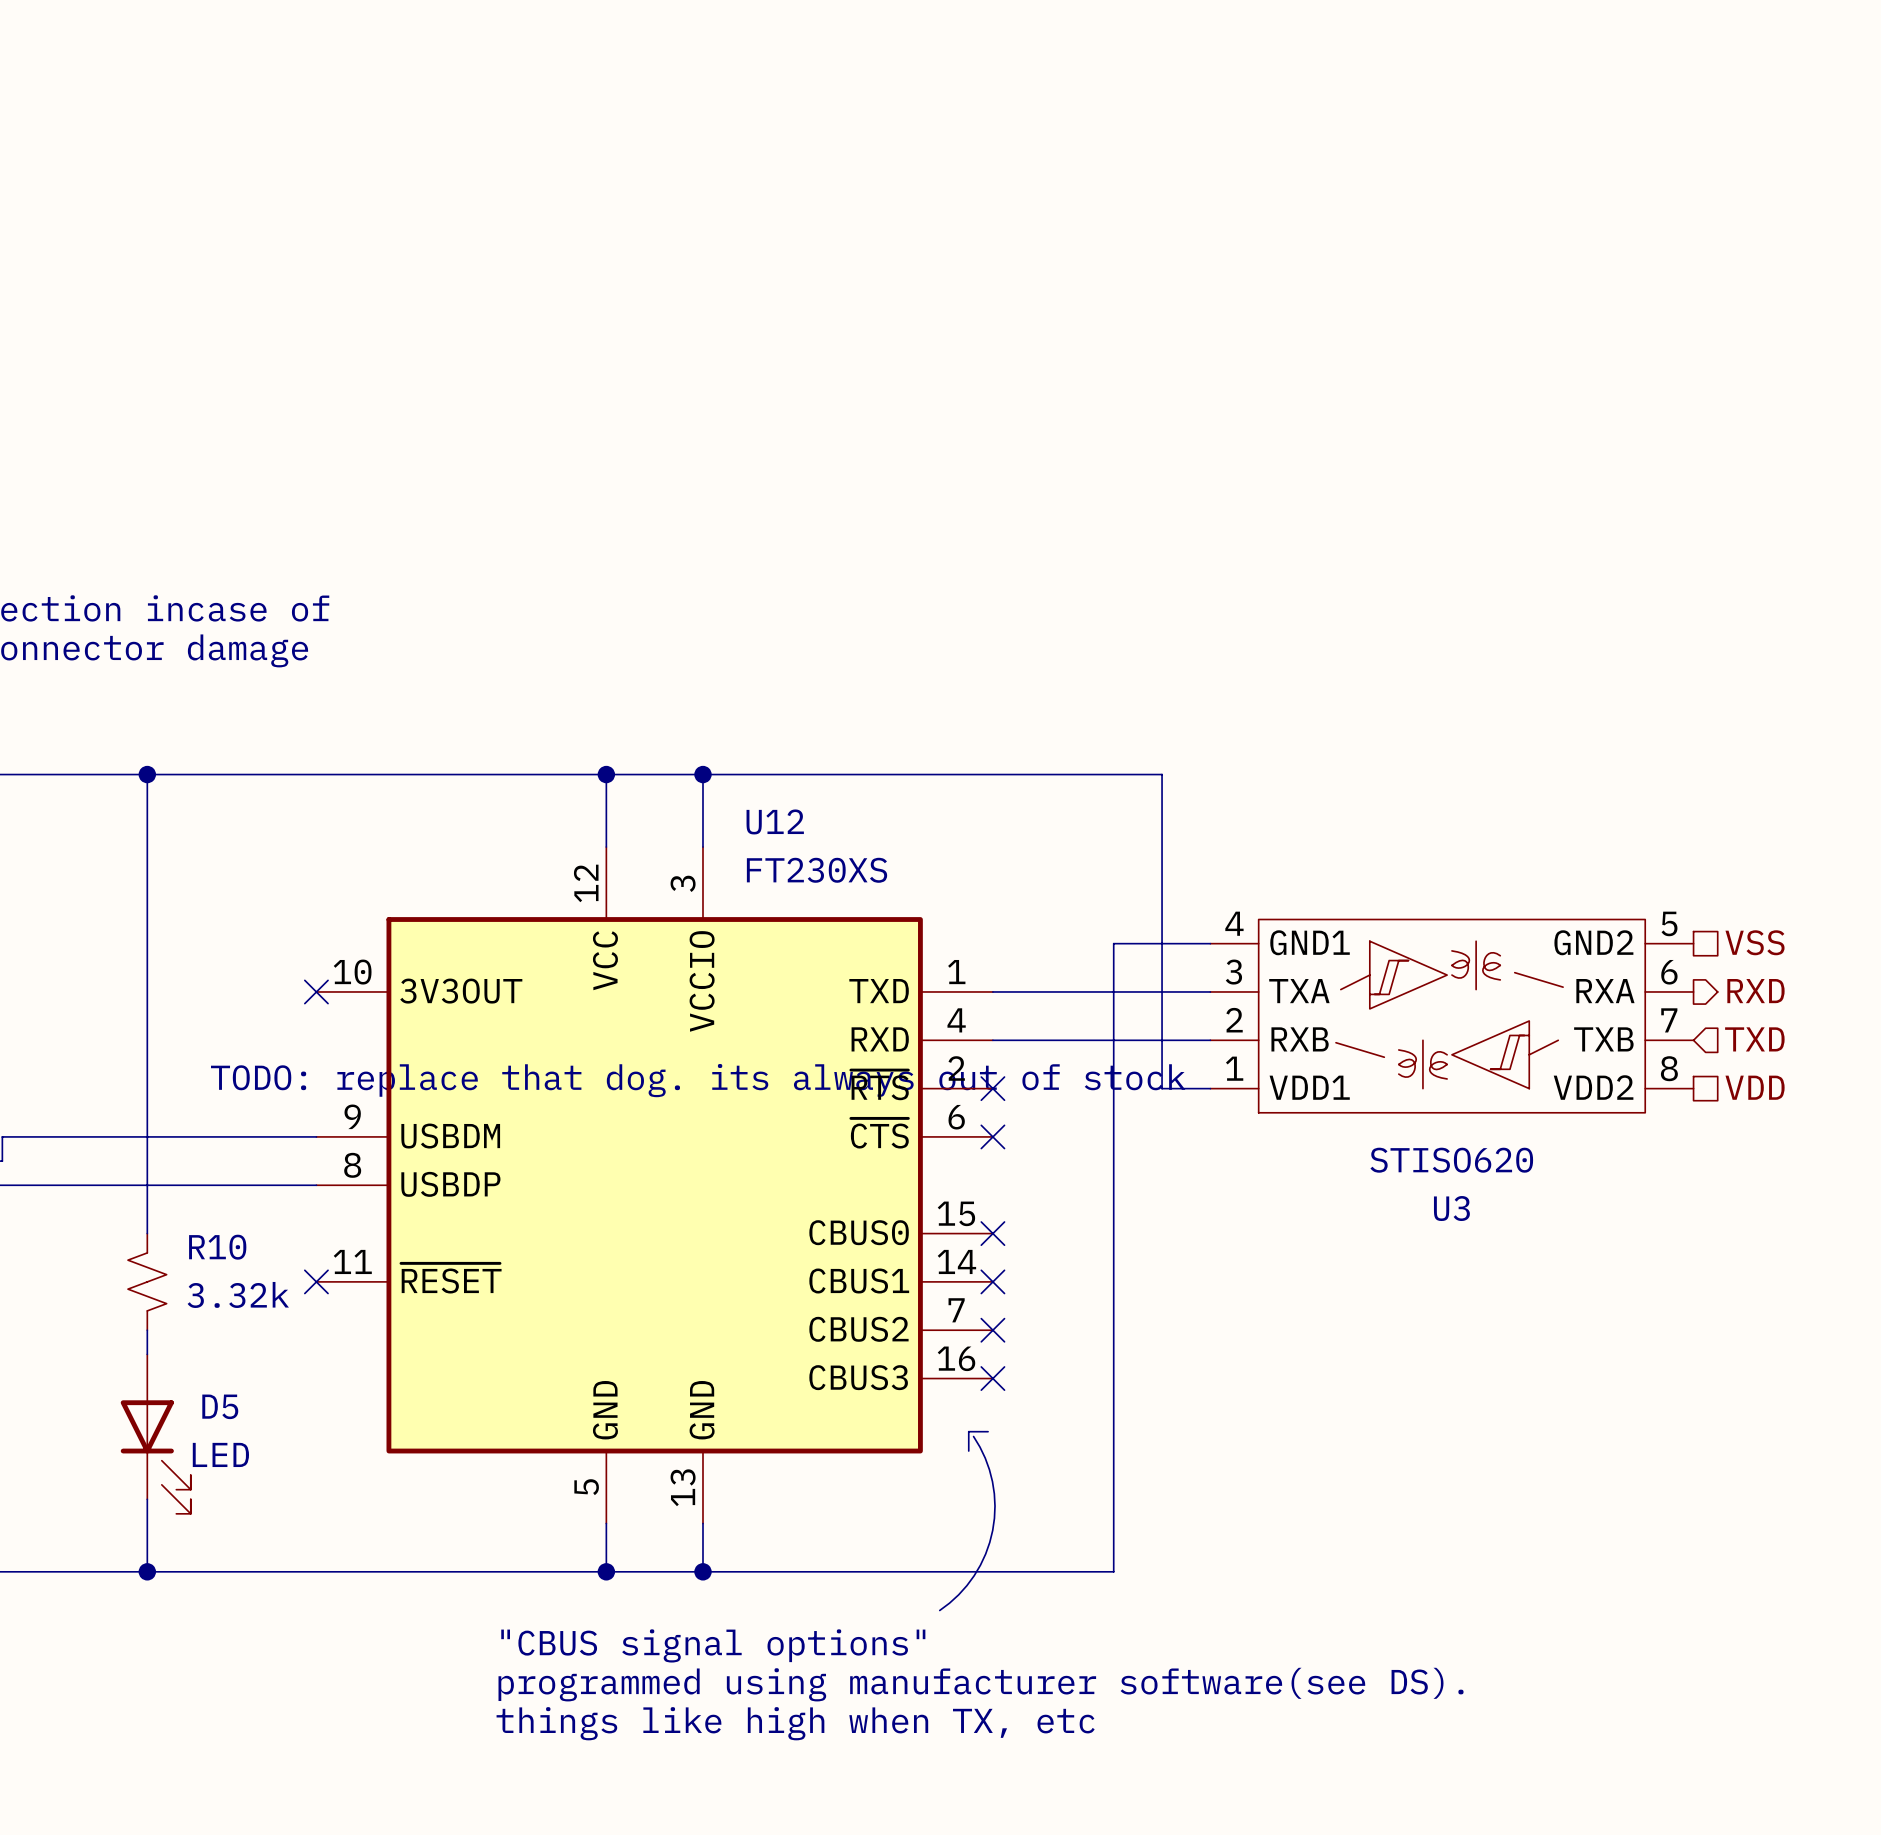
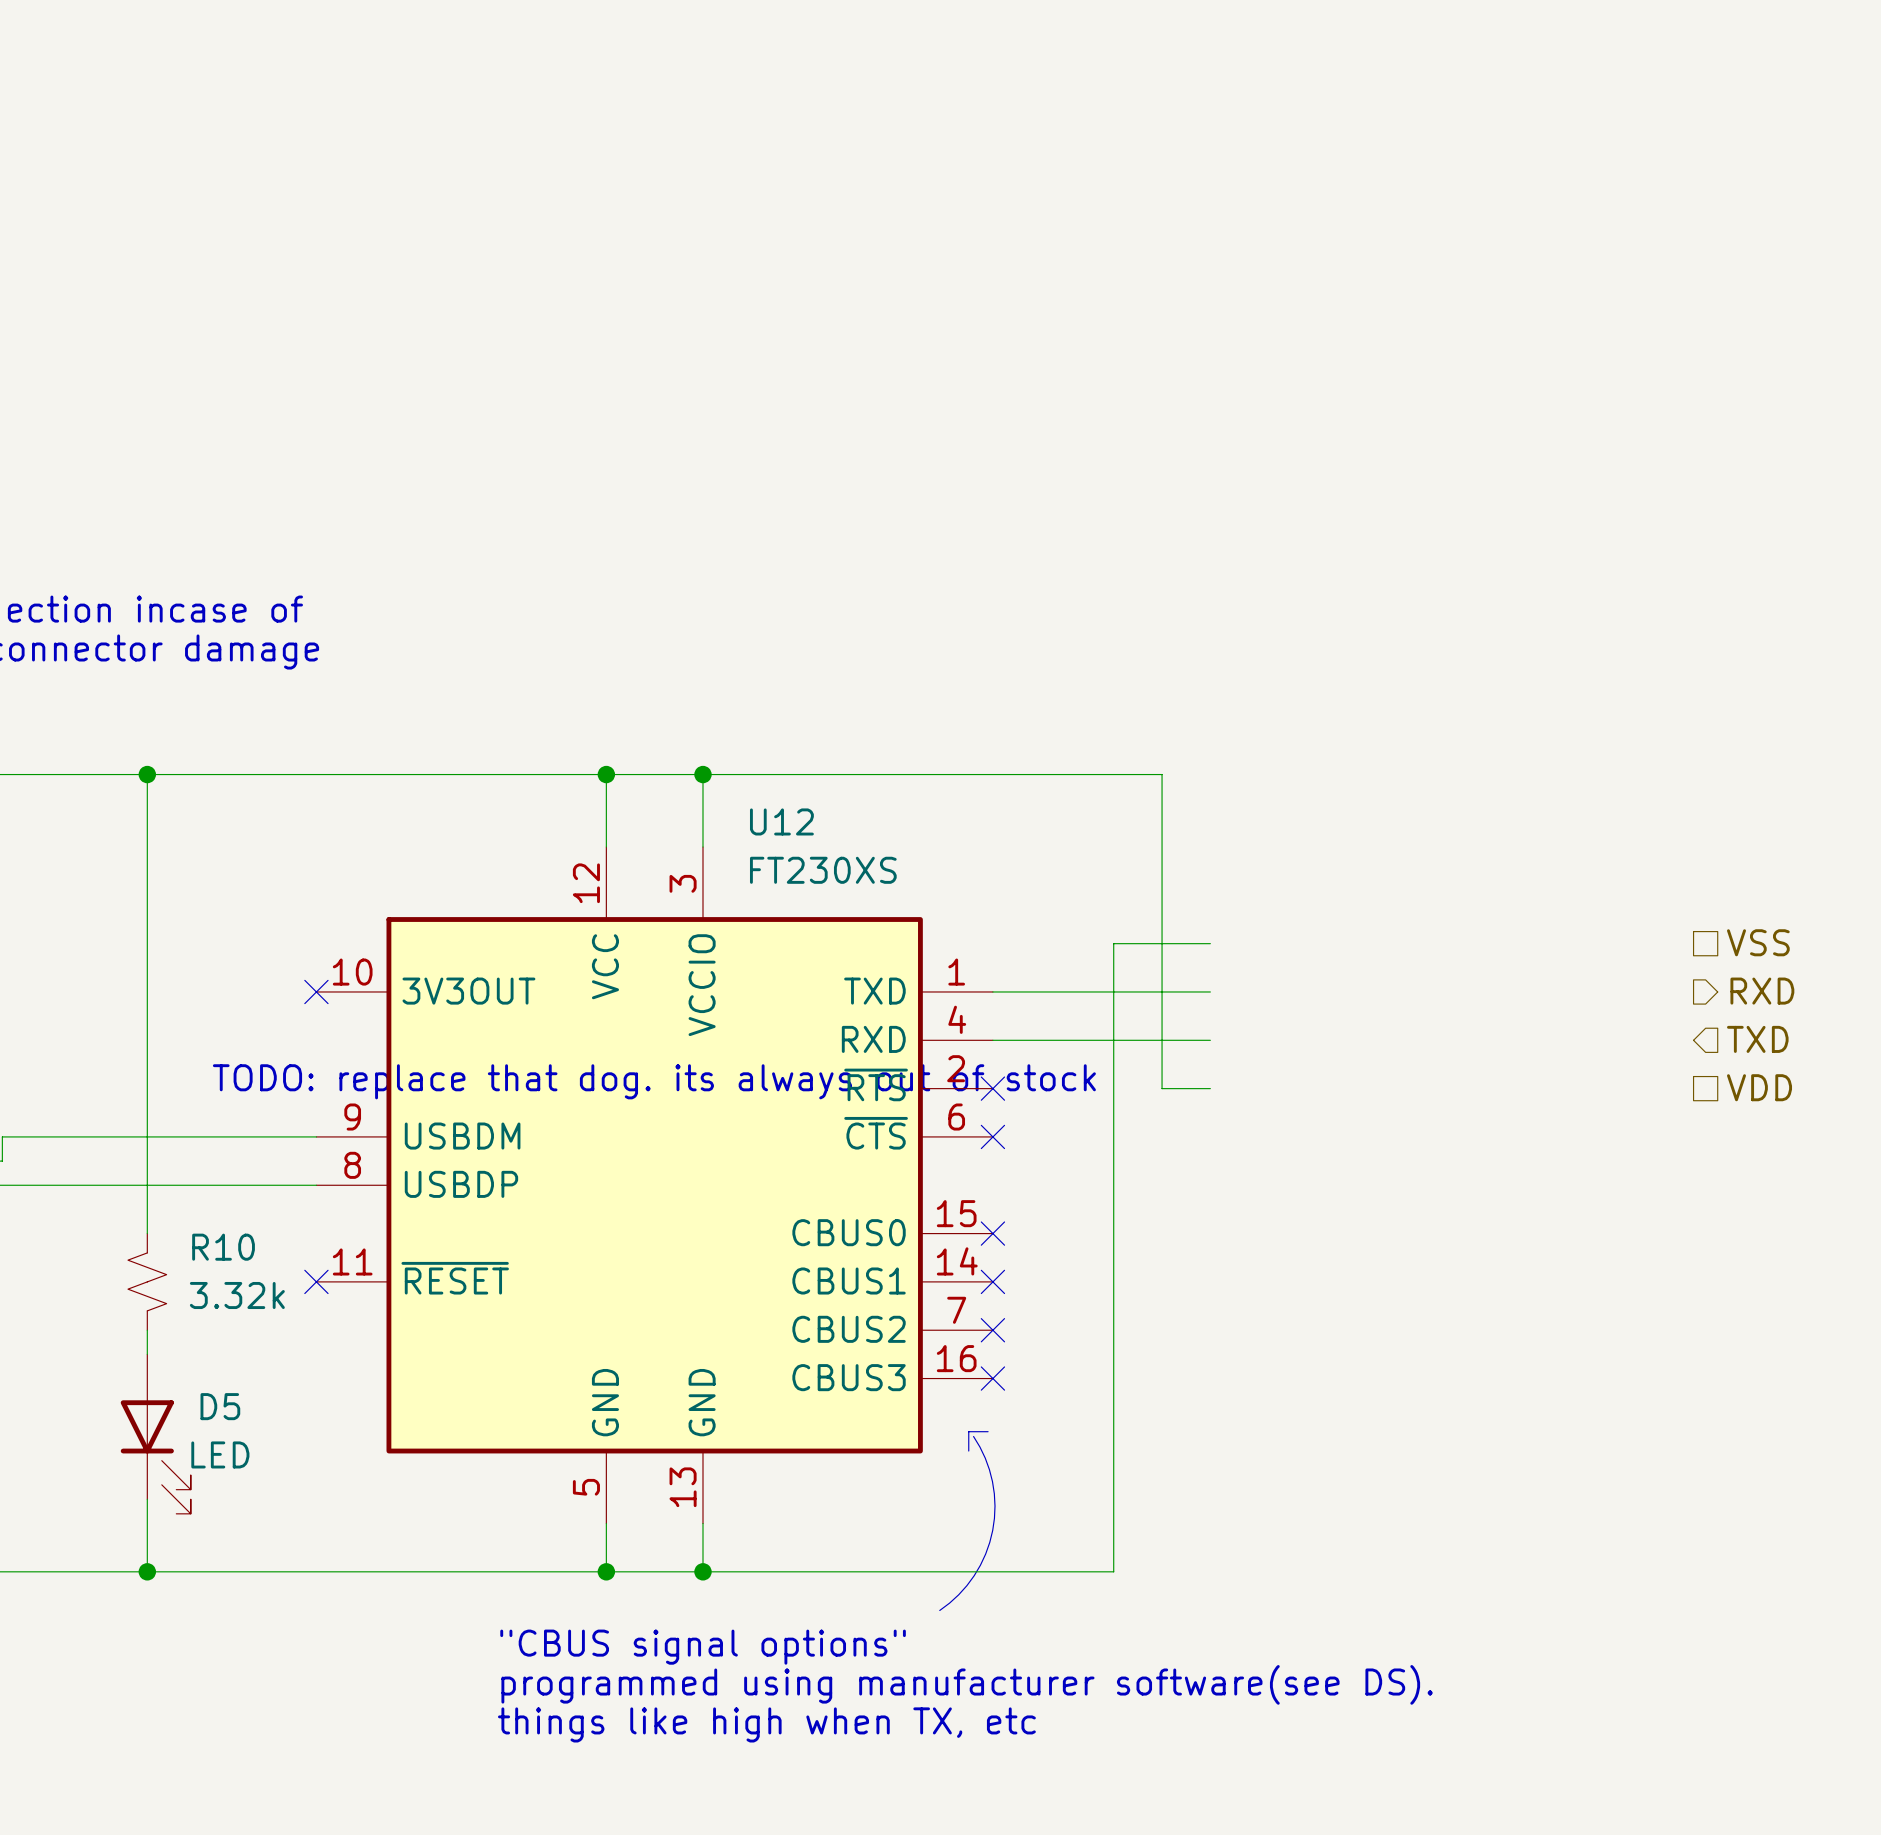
U3: STISO620 (1451, 1016) -> none

